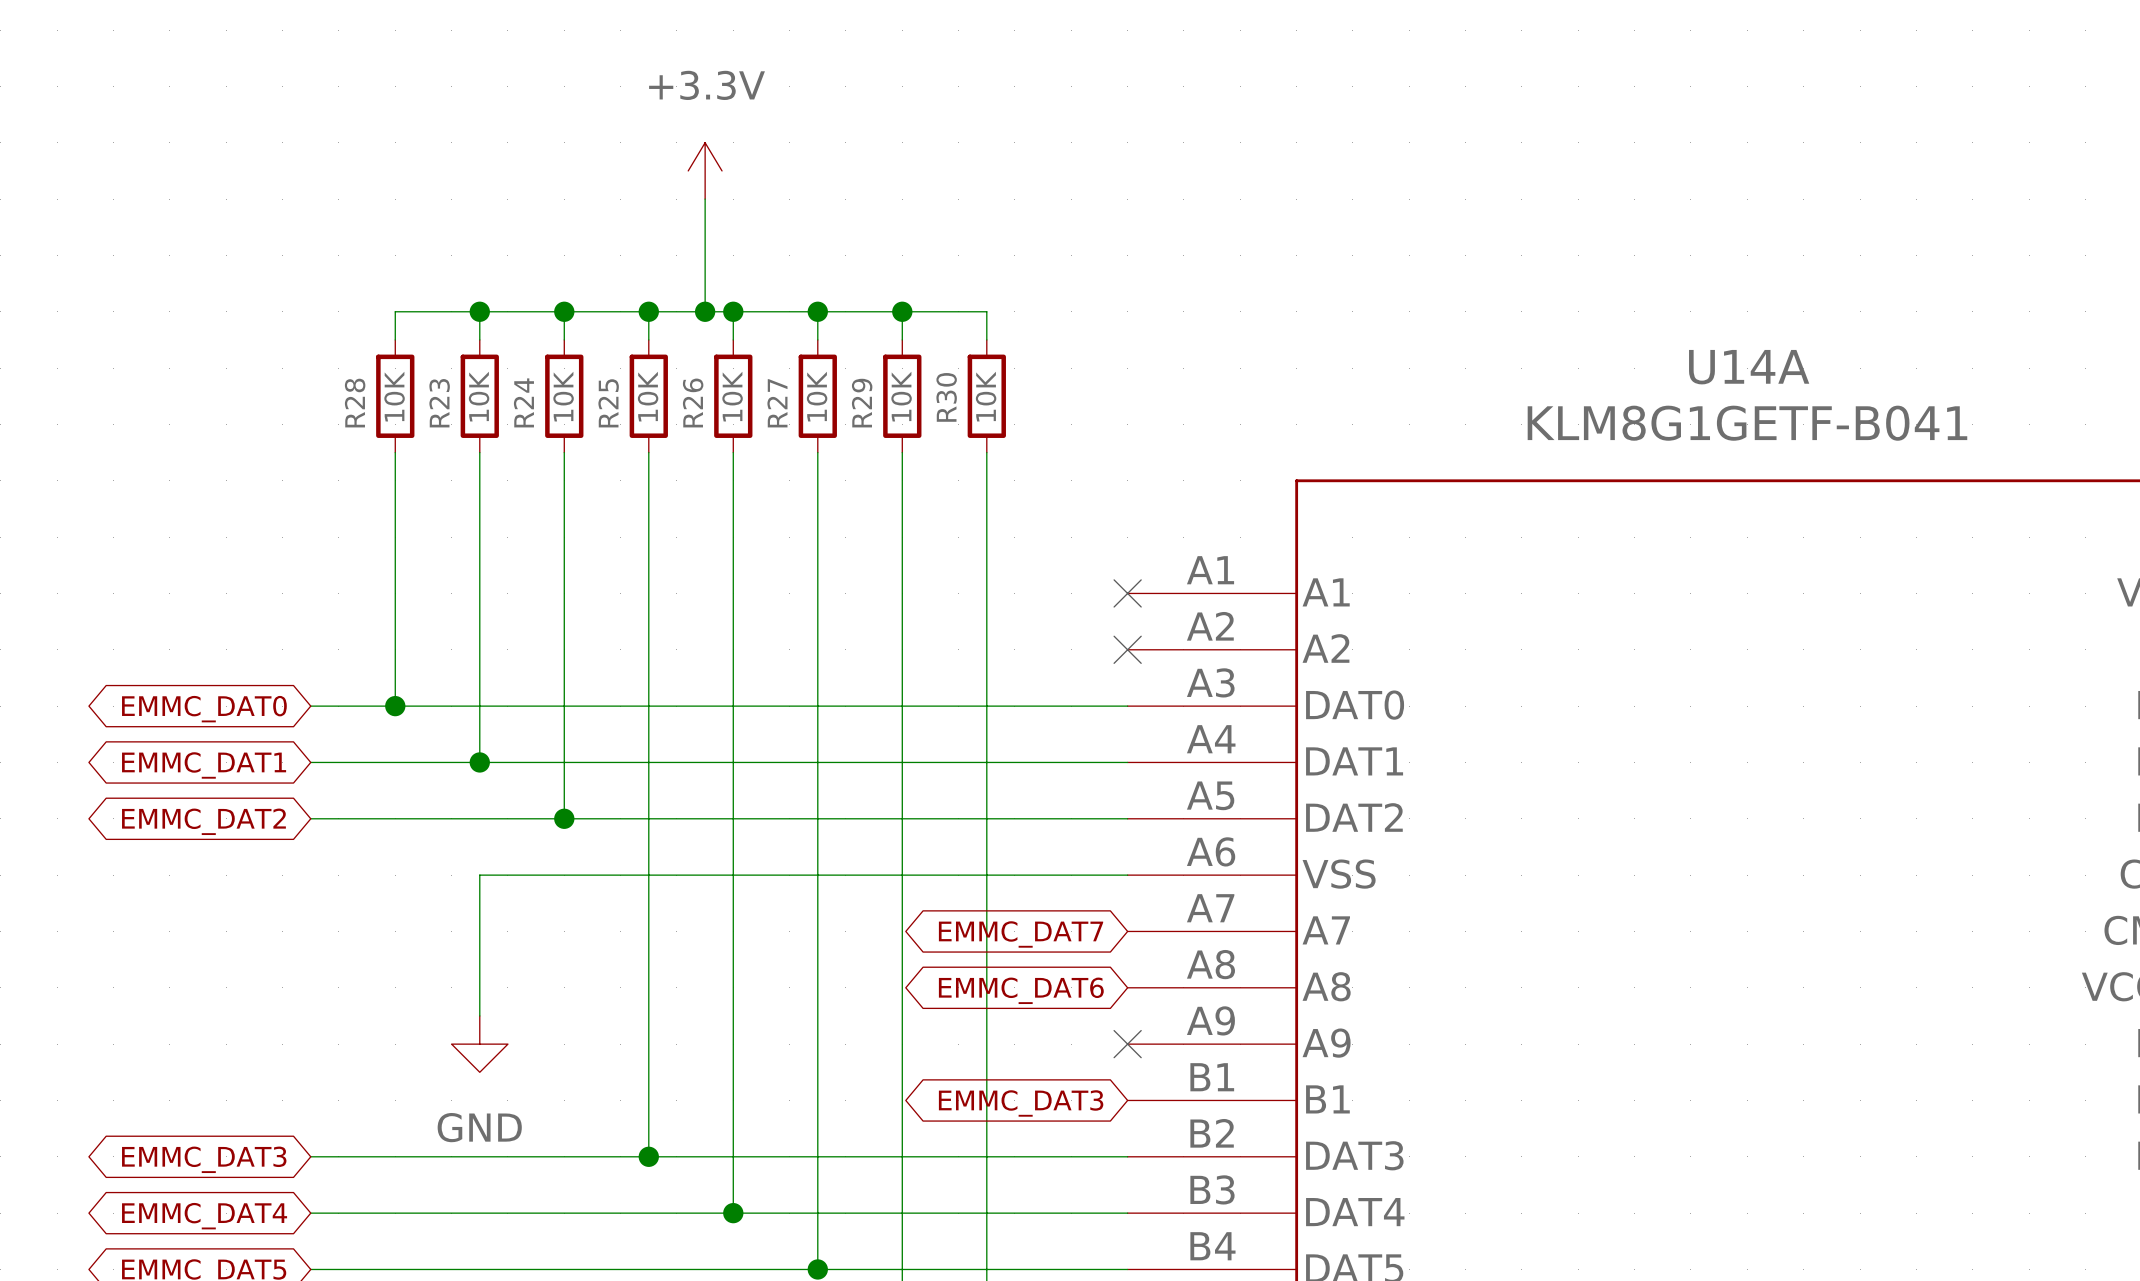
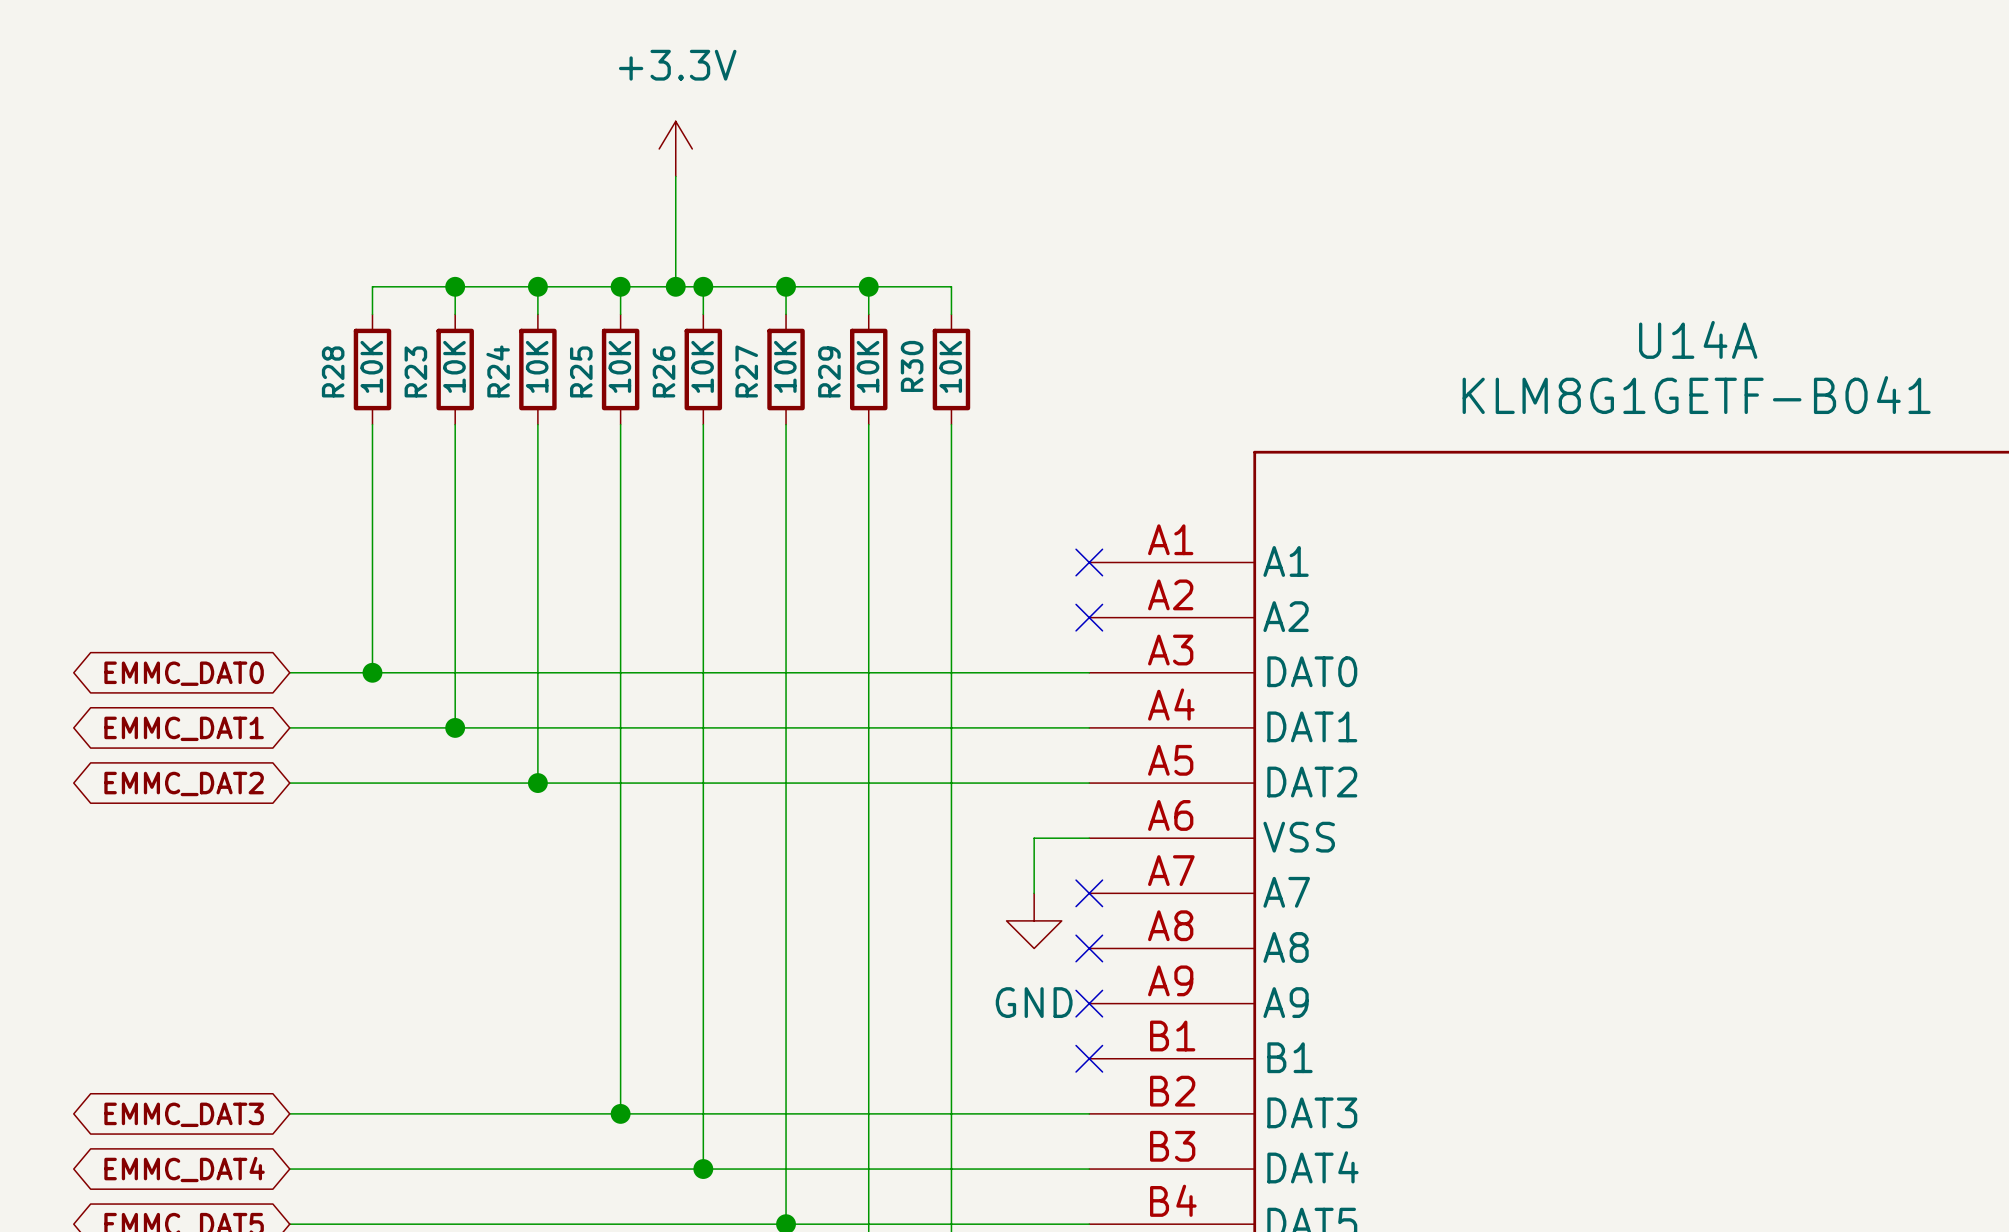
wire: (1071, 875) (479, 875) (479, 1015) -> (1034, 838) (1034, 893)
no-connect mark: none -> (1089, 893)
global label: EMMC_DAT7 (1021, 934) -> none
power symbol: none -> GND (1034, 920)
no-connect mark: none -> (1089, 948)
global label: EMMC_DAT6 (1021, 990) -> none
power symbol: GND (479, 1044) -> none
no-connect mark: none -> (1089, 1058)
global label: EMMC_DAT3 (1021, 1103) -> none

